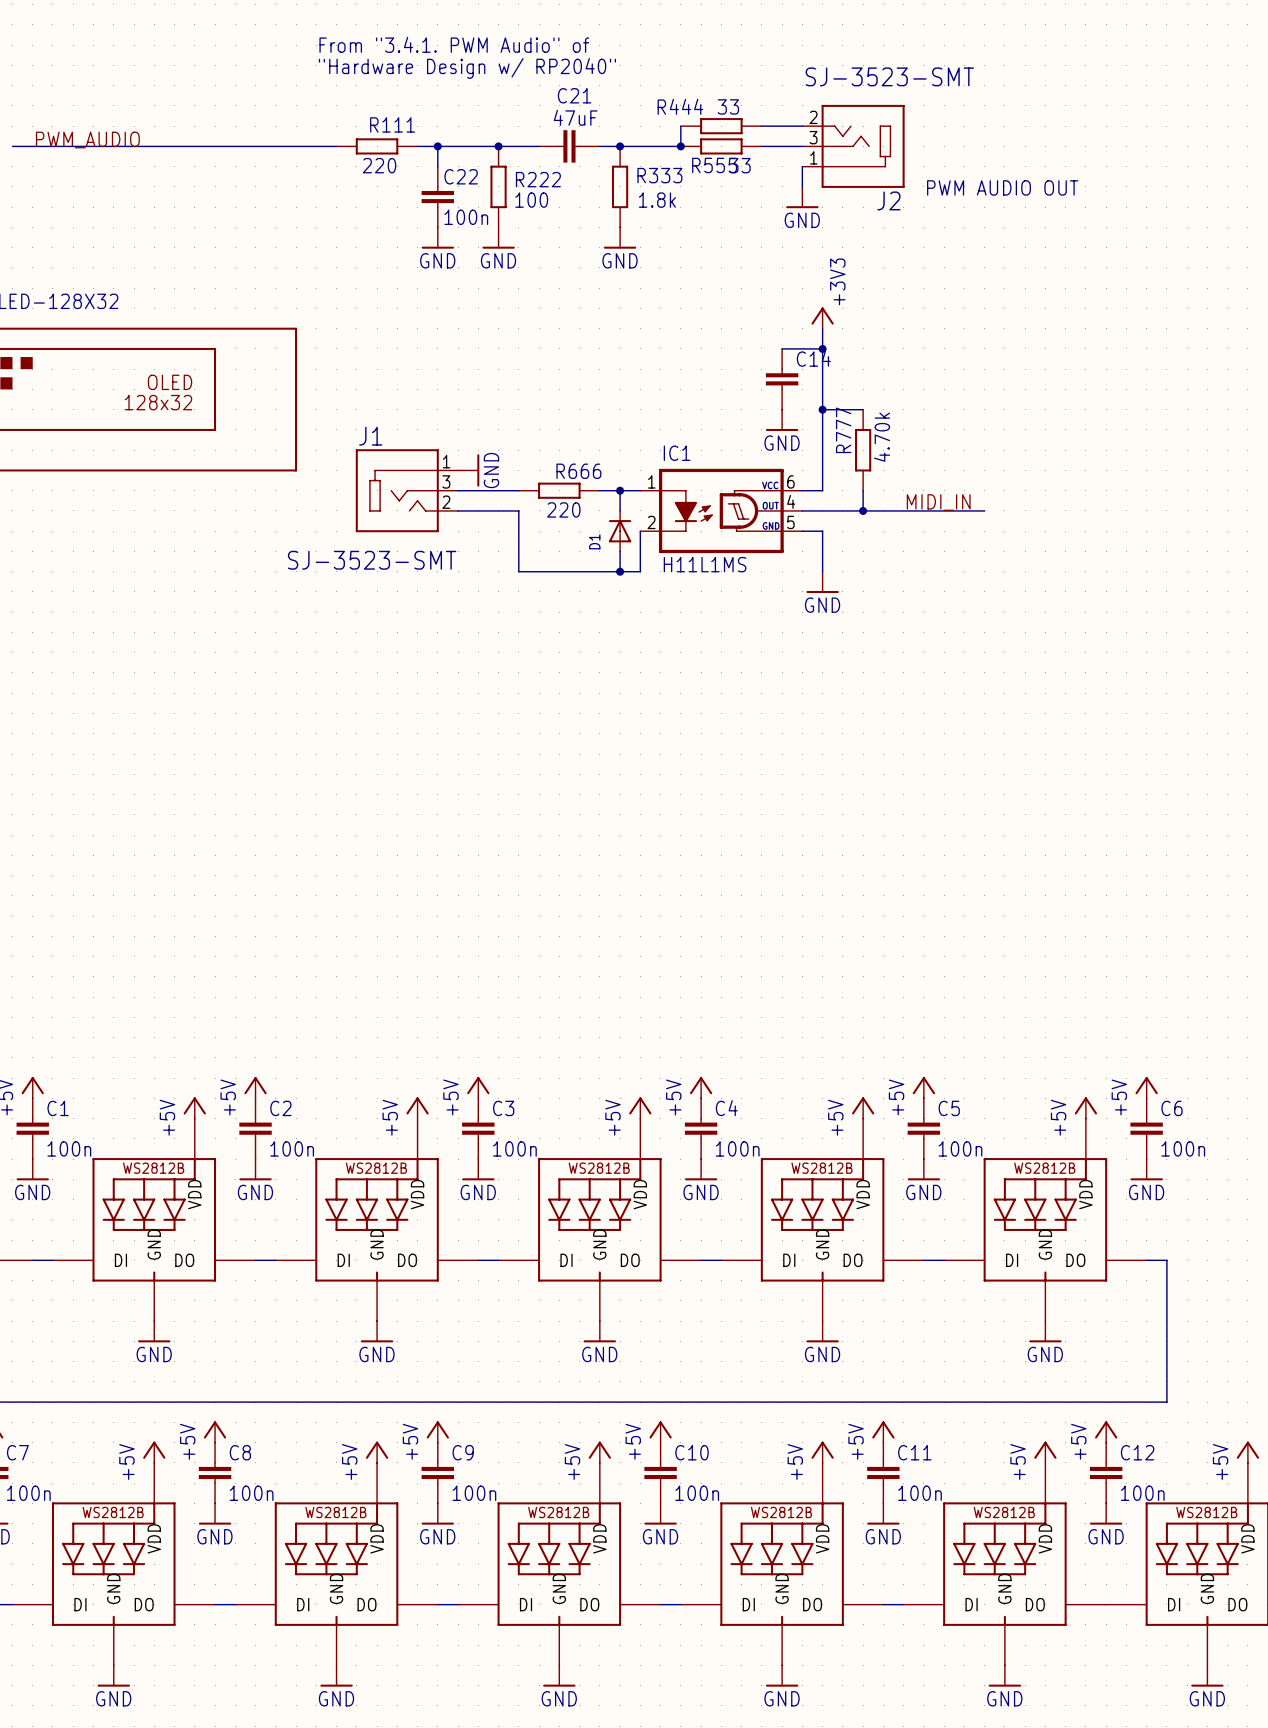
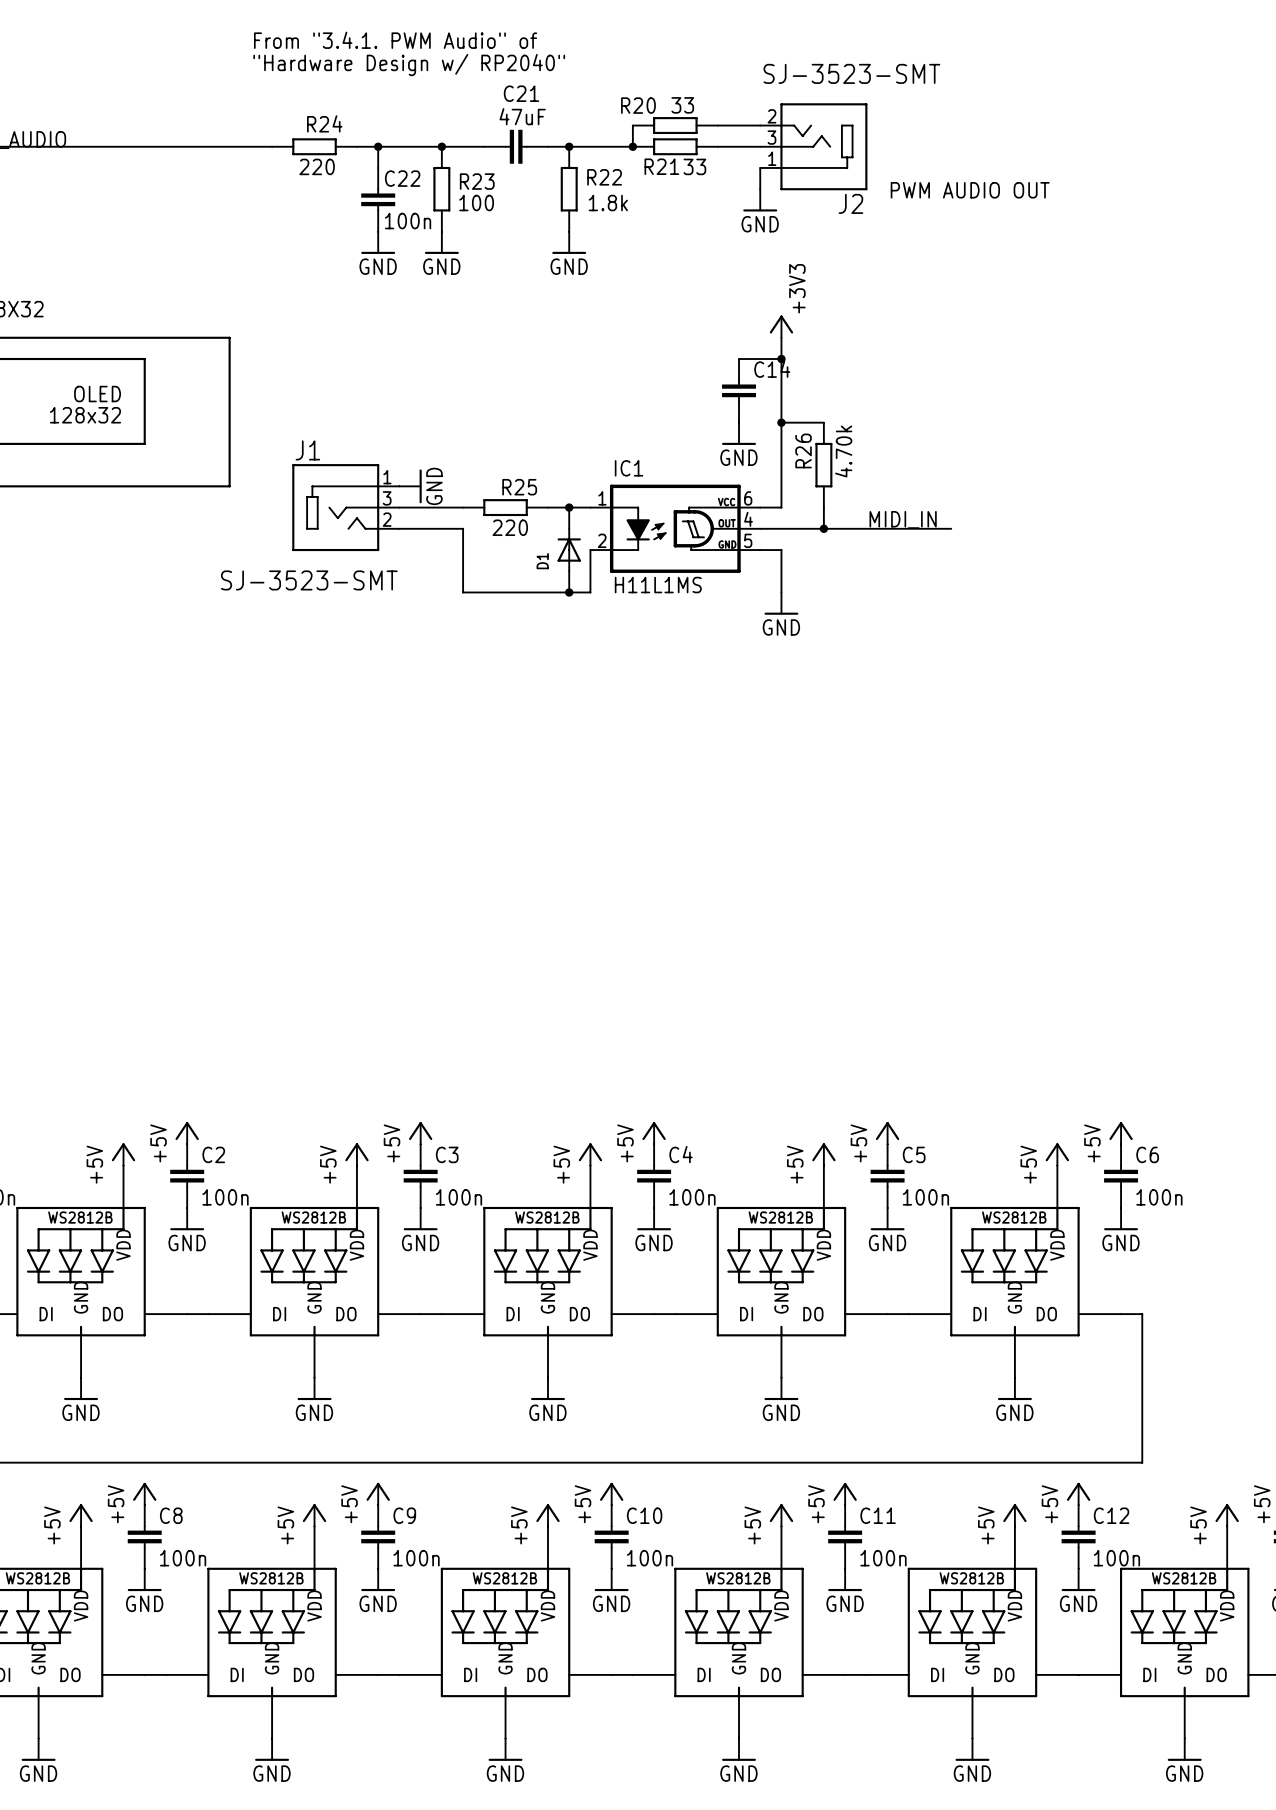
R444 name: R444 (680, 106) -> R20 (638, 105)
R111 name: R111 (392, 124) -> R24 (324, 123)
R555 name: R555 (714, 165) -> R21 (661, 166)
R333 name: R333 (659, 175) -> R22 (604, 177)
R222 name: R222 (538, 179) -> R23 (477, 181)
R777 name: R777 (843, 430) -> R26 (803, 450)
R666 name: R666 (578, 471) -> R25 (519, 487)

